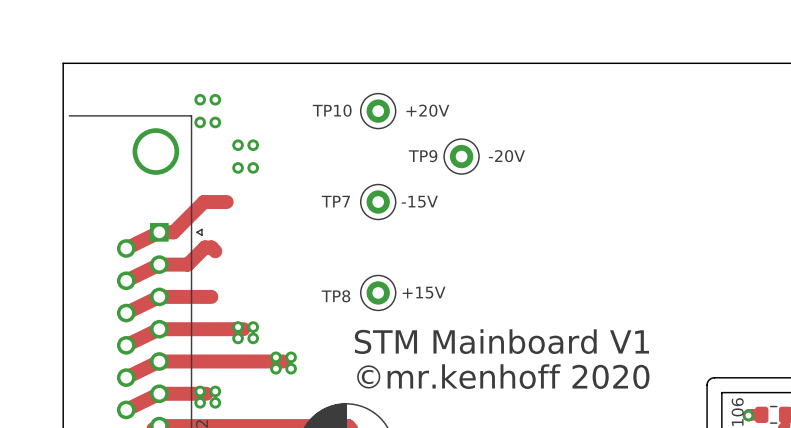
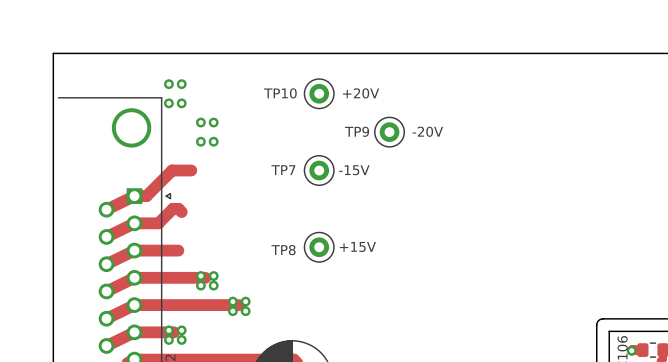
text: STM Mainboard V1 (501, 341) -> none
text: ©mr.kenhoff 2020 (503, 376) -> none

